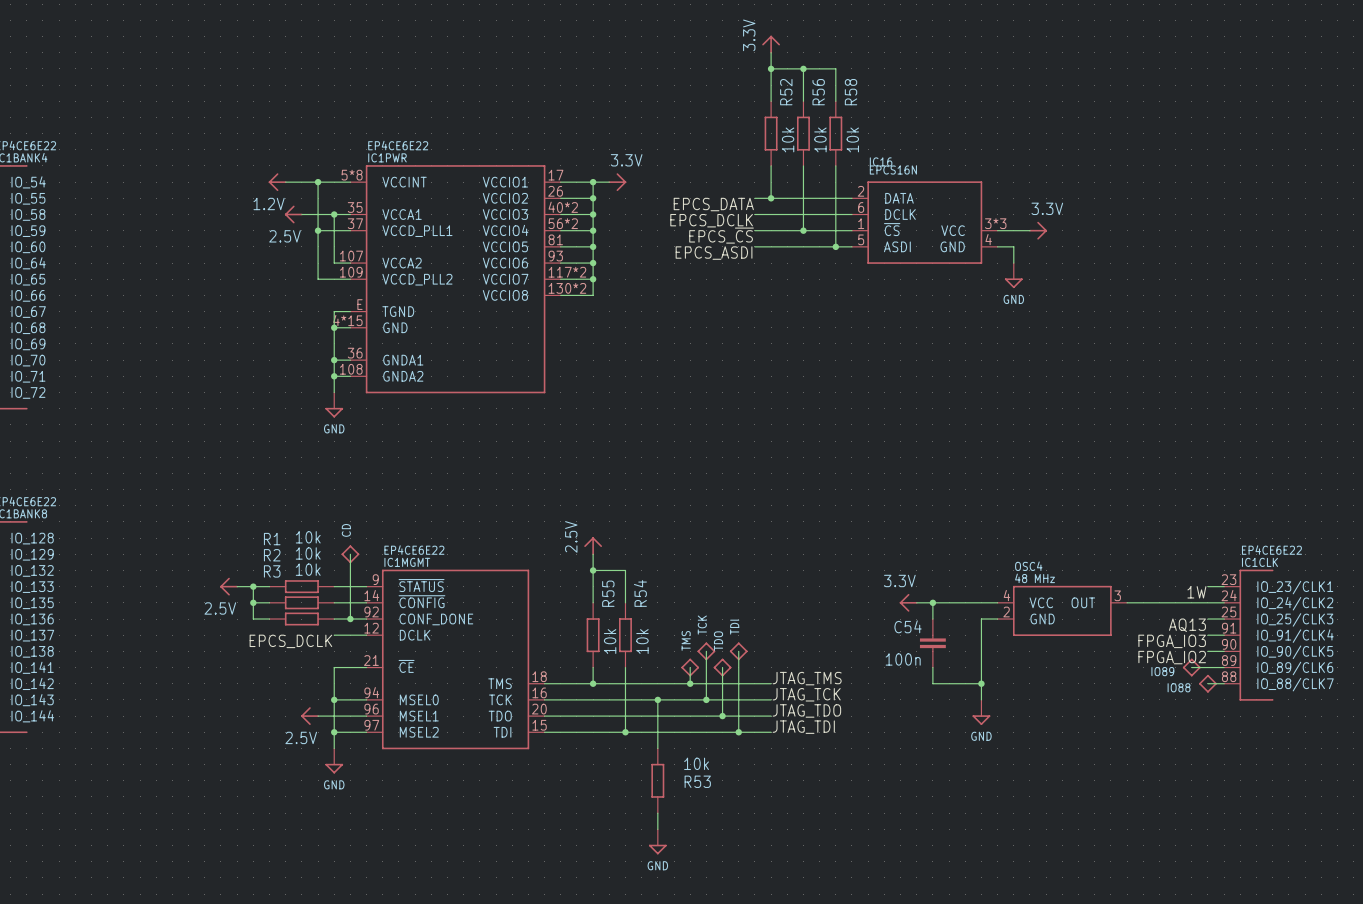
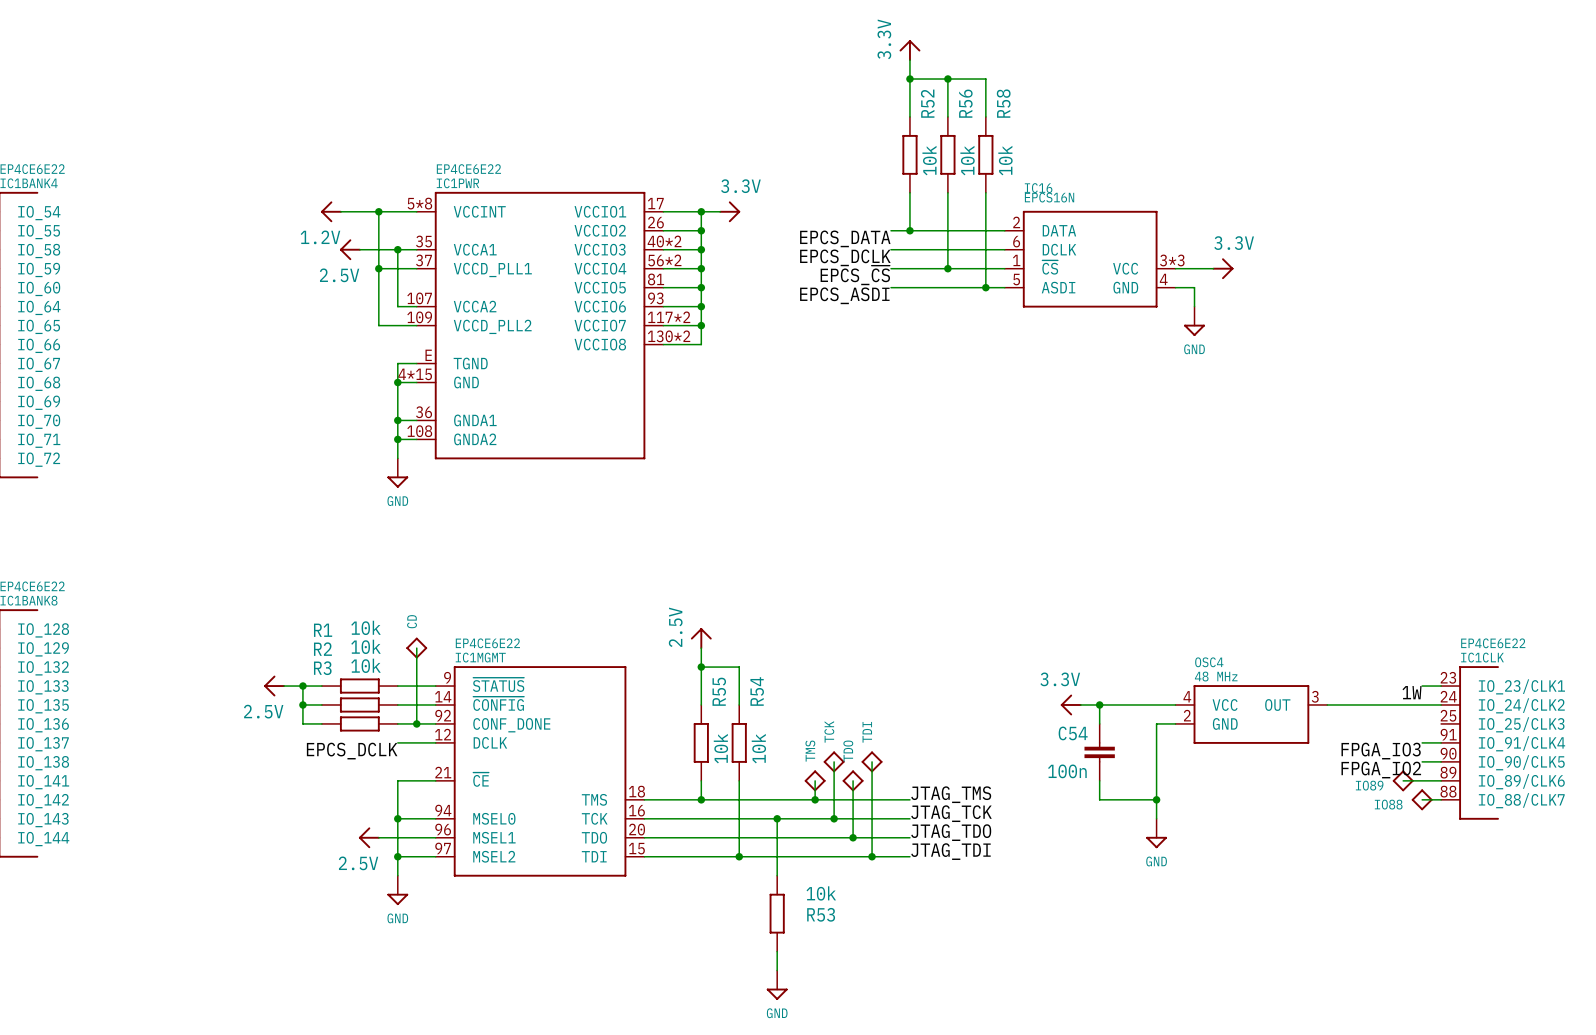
wire: (1207, 619) (1224, 619) -> none
label: AQ13 (1187, 625) -> none

